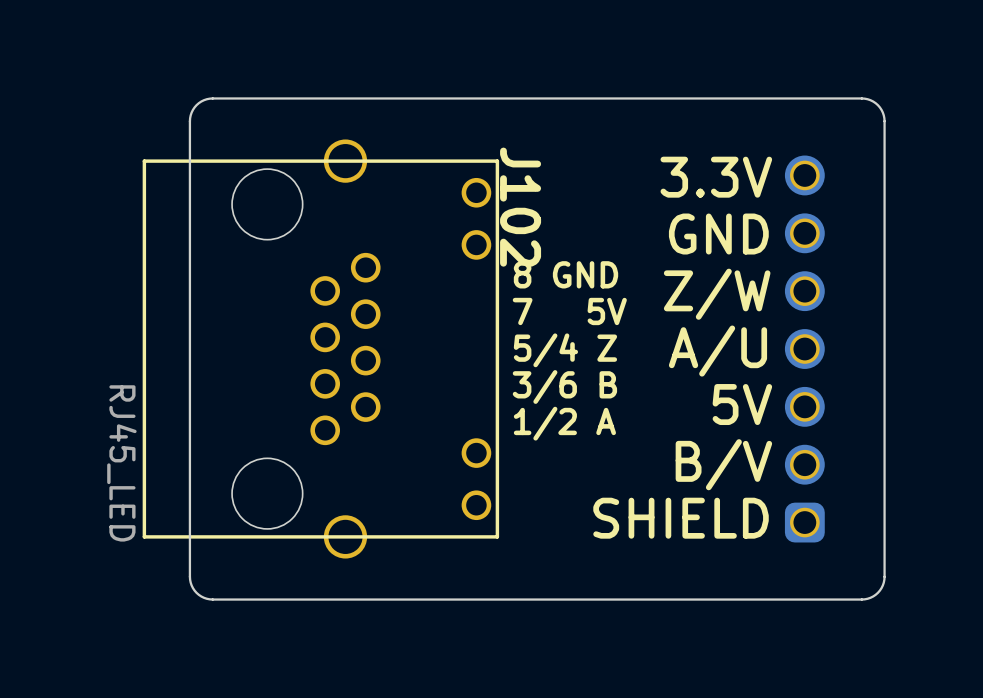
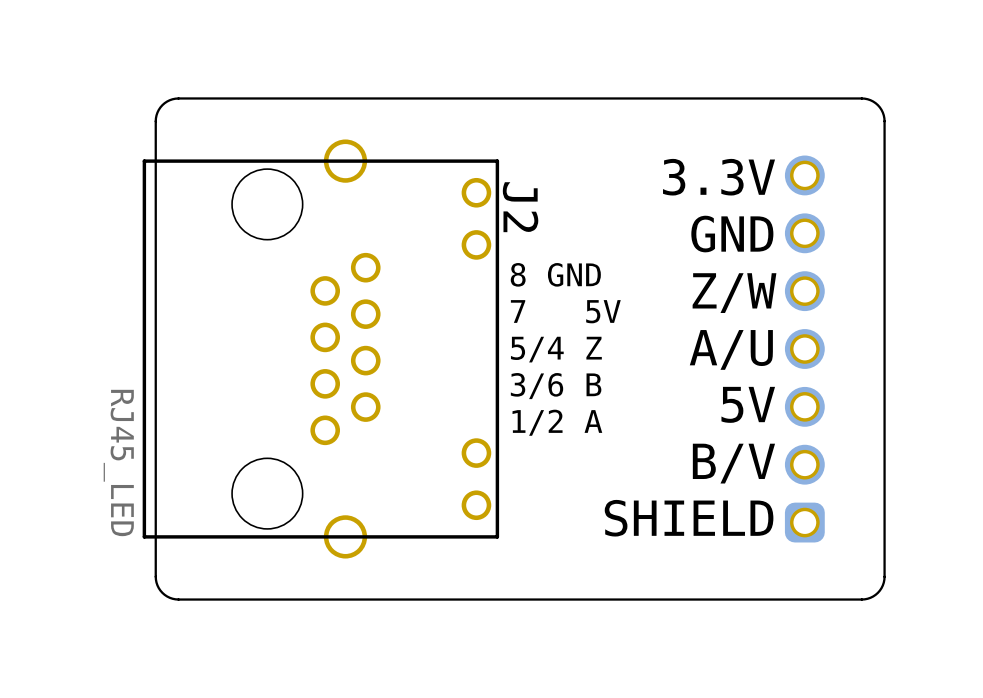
board edge: (212, 98) (203, 100) (196, 105) (191, 112) (189, 121) (189, 576) (191, 585) (196, 592) (203, 597) (212, 599) -> (212, 98) (169, 100) (160, 107) (155, 121) (155, 579) (160, 590) (169, 597) (212, 599)
J102 name: J102 (520, 207) -> J2 (520, 207)

